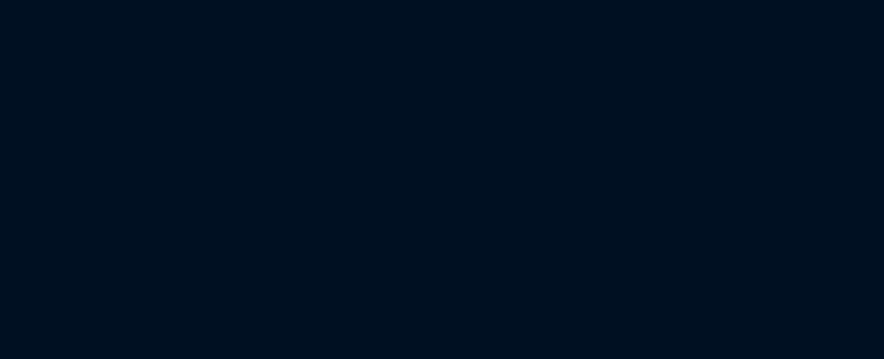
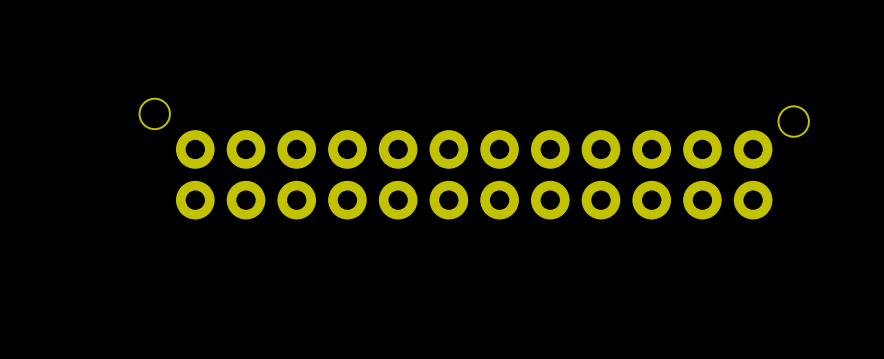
part: none -> (474, 159)

